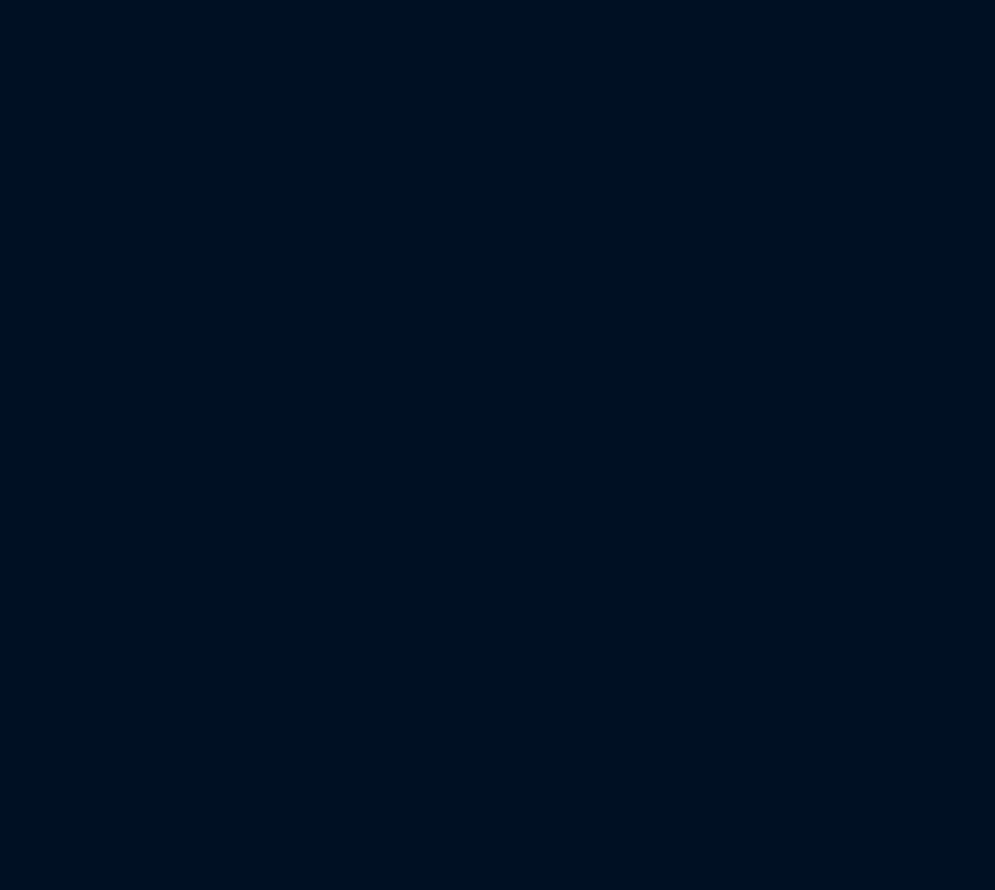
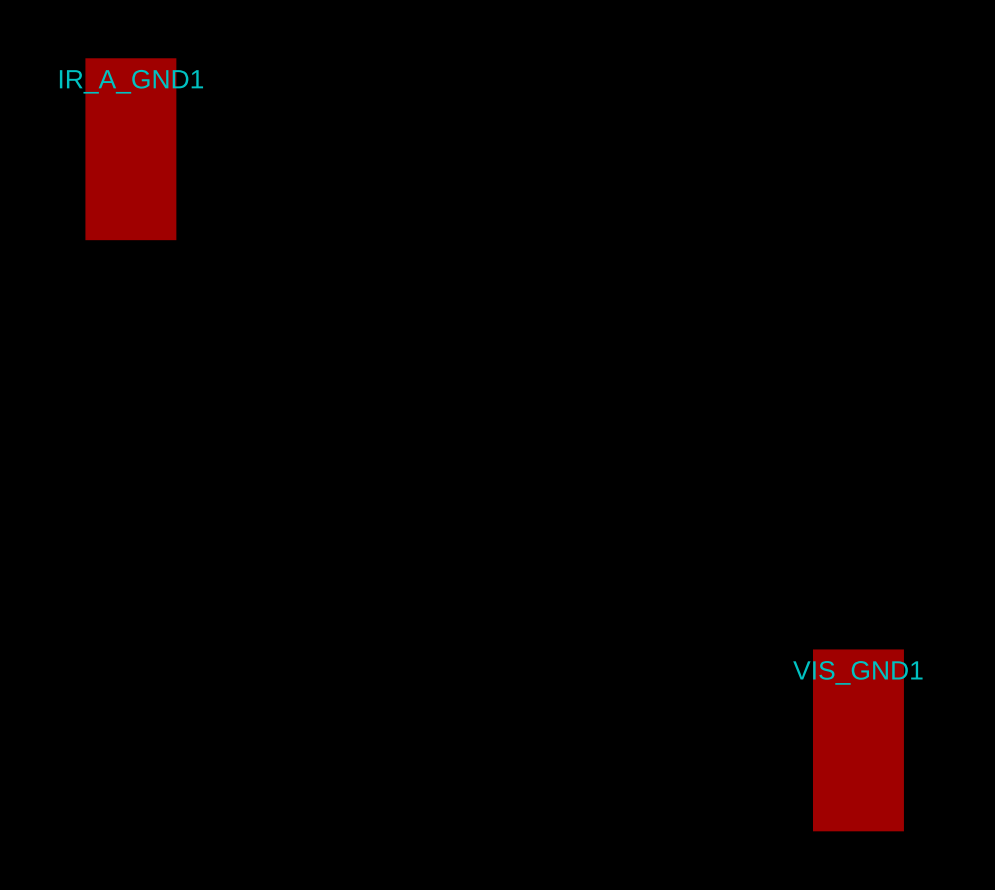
IR_A_GND1: none -> (130, 149)
VIS_GND1: none -> (858, 740)

